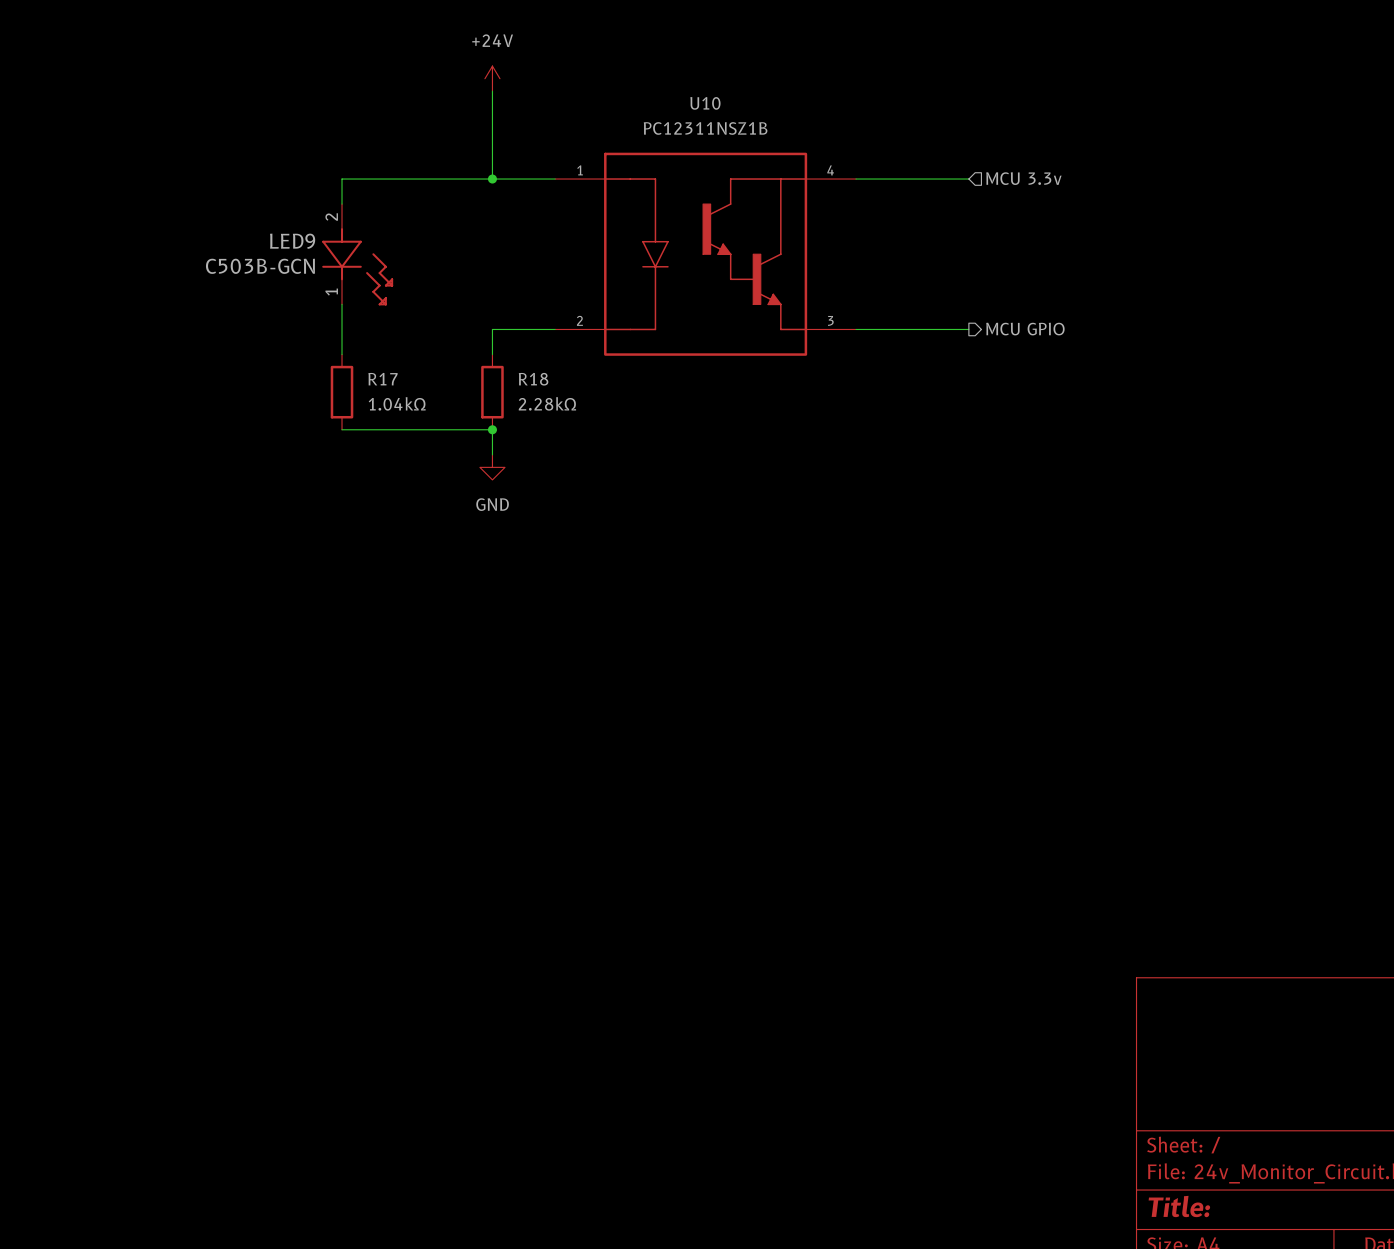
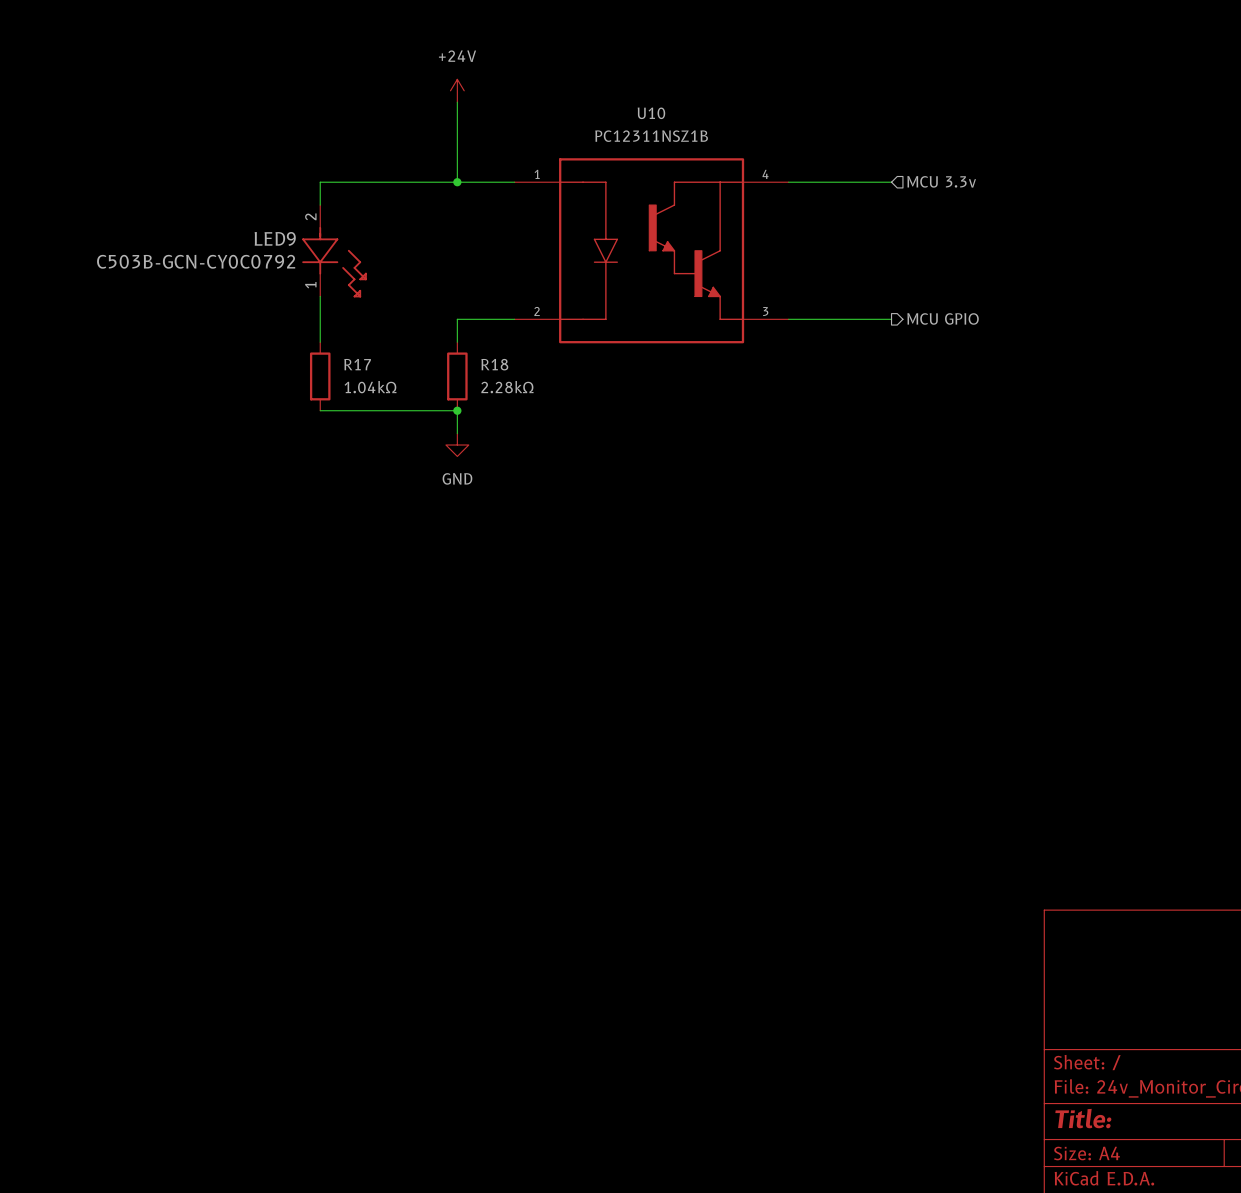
LED9 value: C503B-GCN (260, 266) -> C503B-GCN-CY0C0792 (196, 261)

